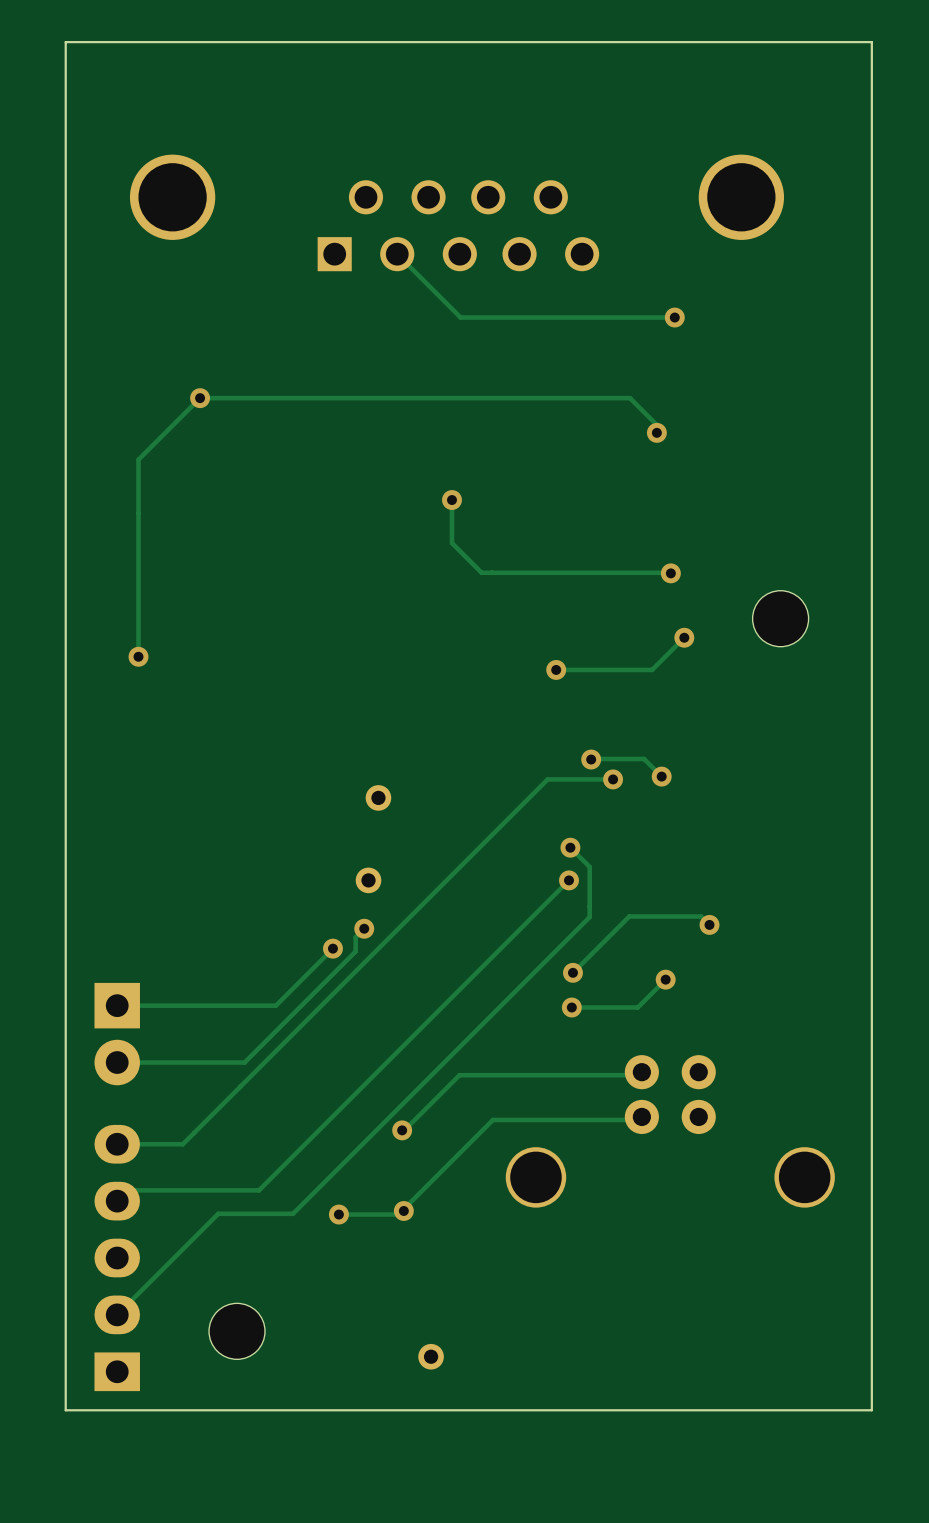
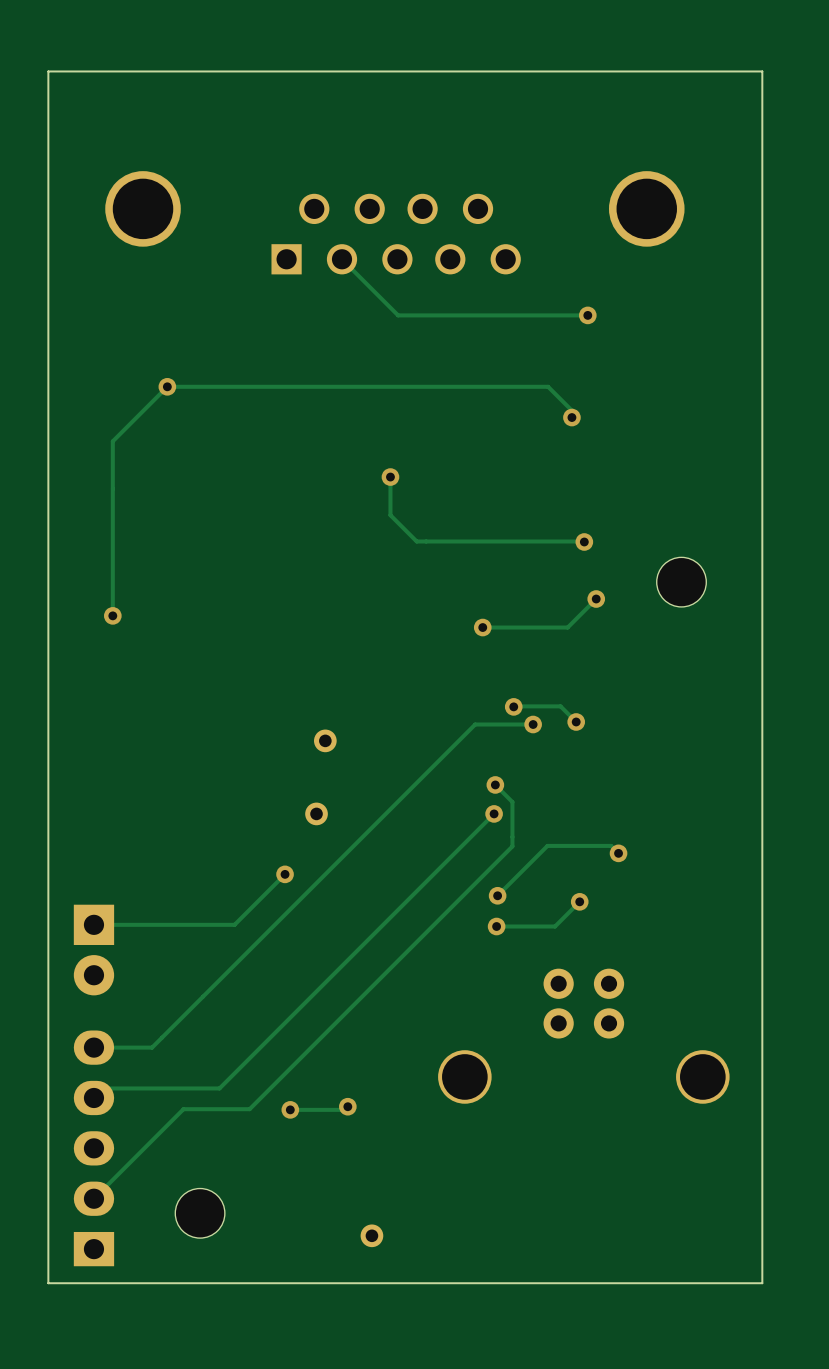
track: (364, 928) (355, 937) (355, 951) (244, 1062) (117, 1062) -> none
via: (364, 928) -> none
track: (642, 1075) (459, 1075) (402, 1130) -> none
track: (642, 1119) (492, 1119) (403, 1209) -> none
via: (402, 1130) -> none

